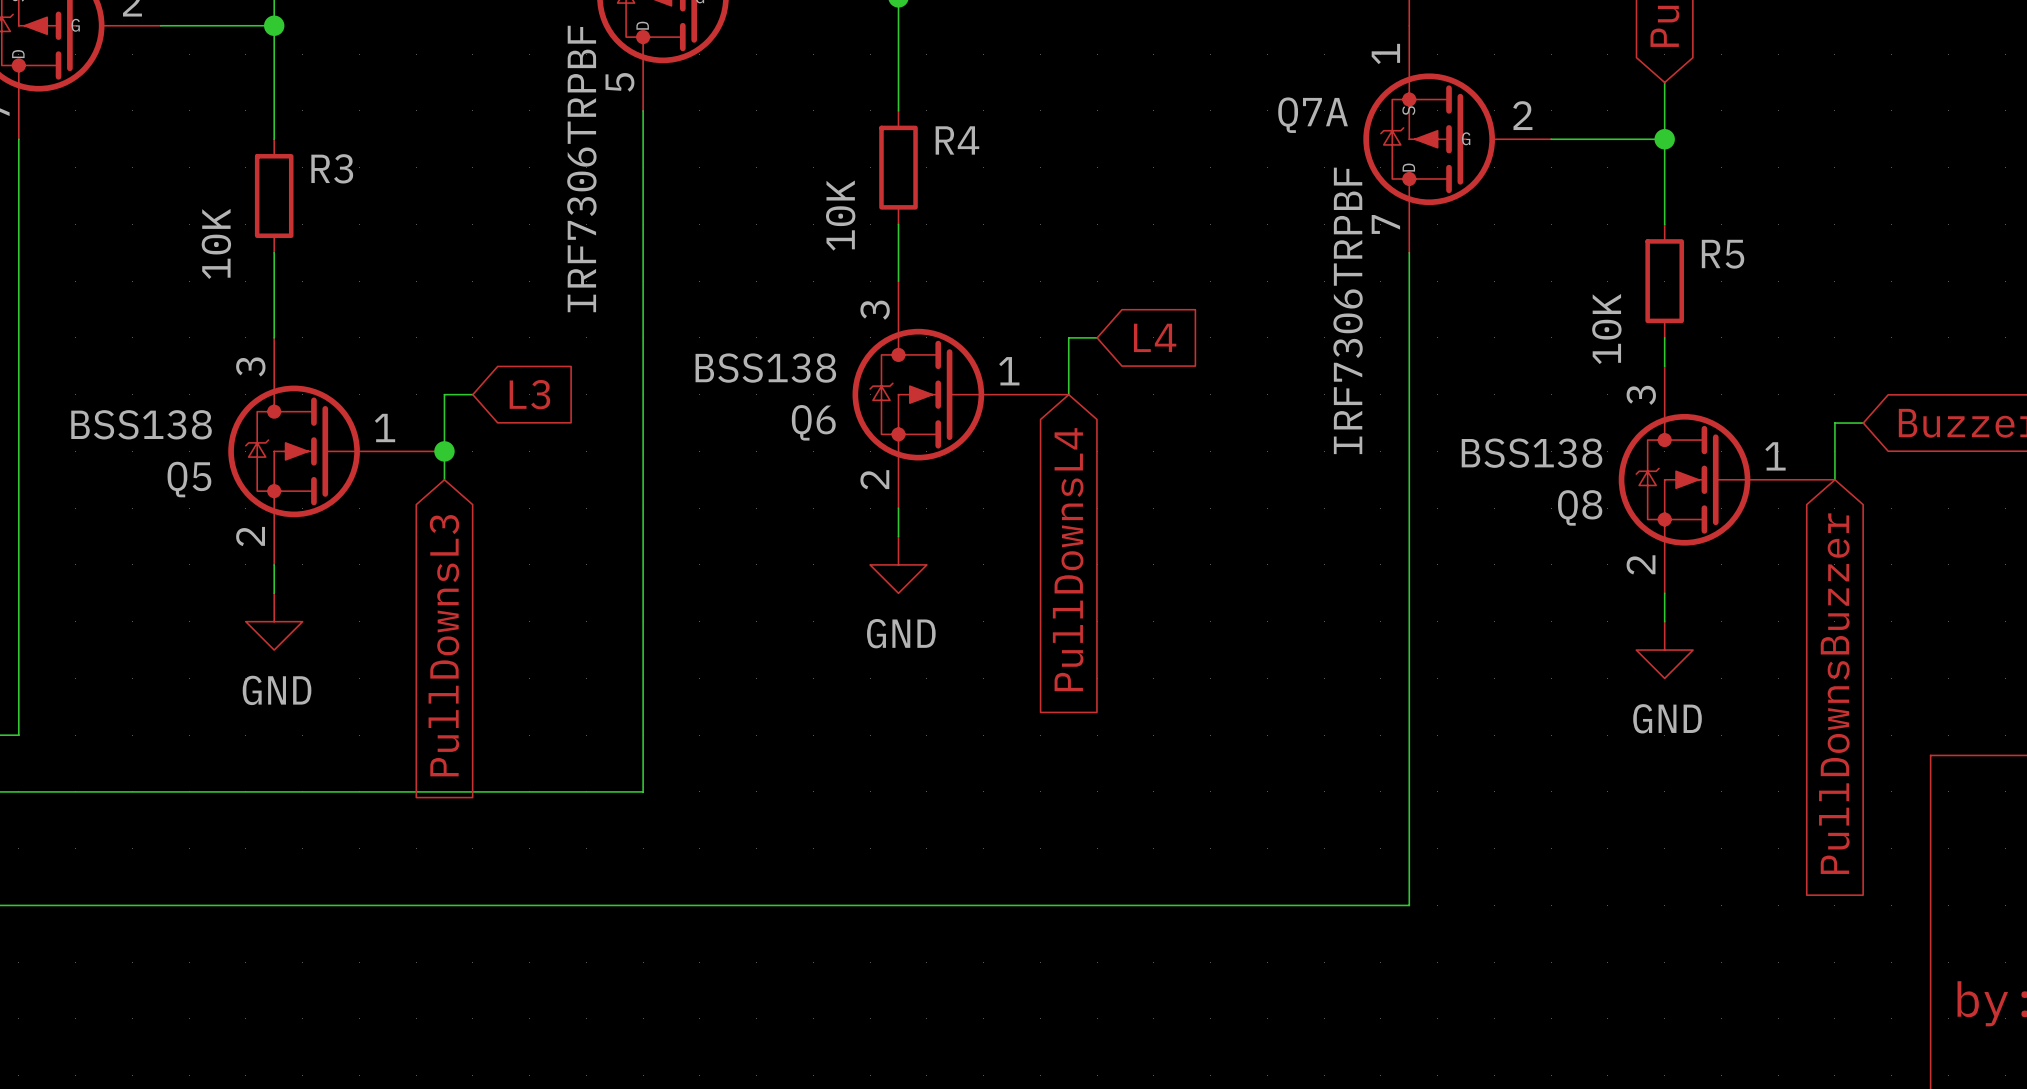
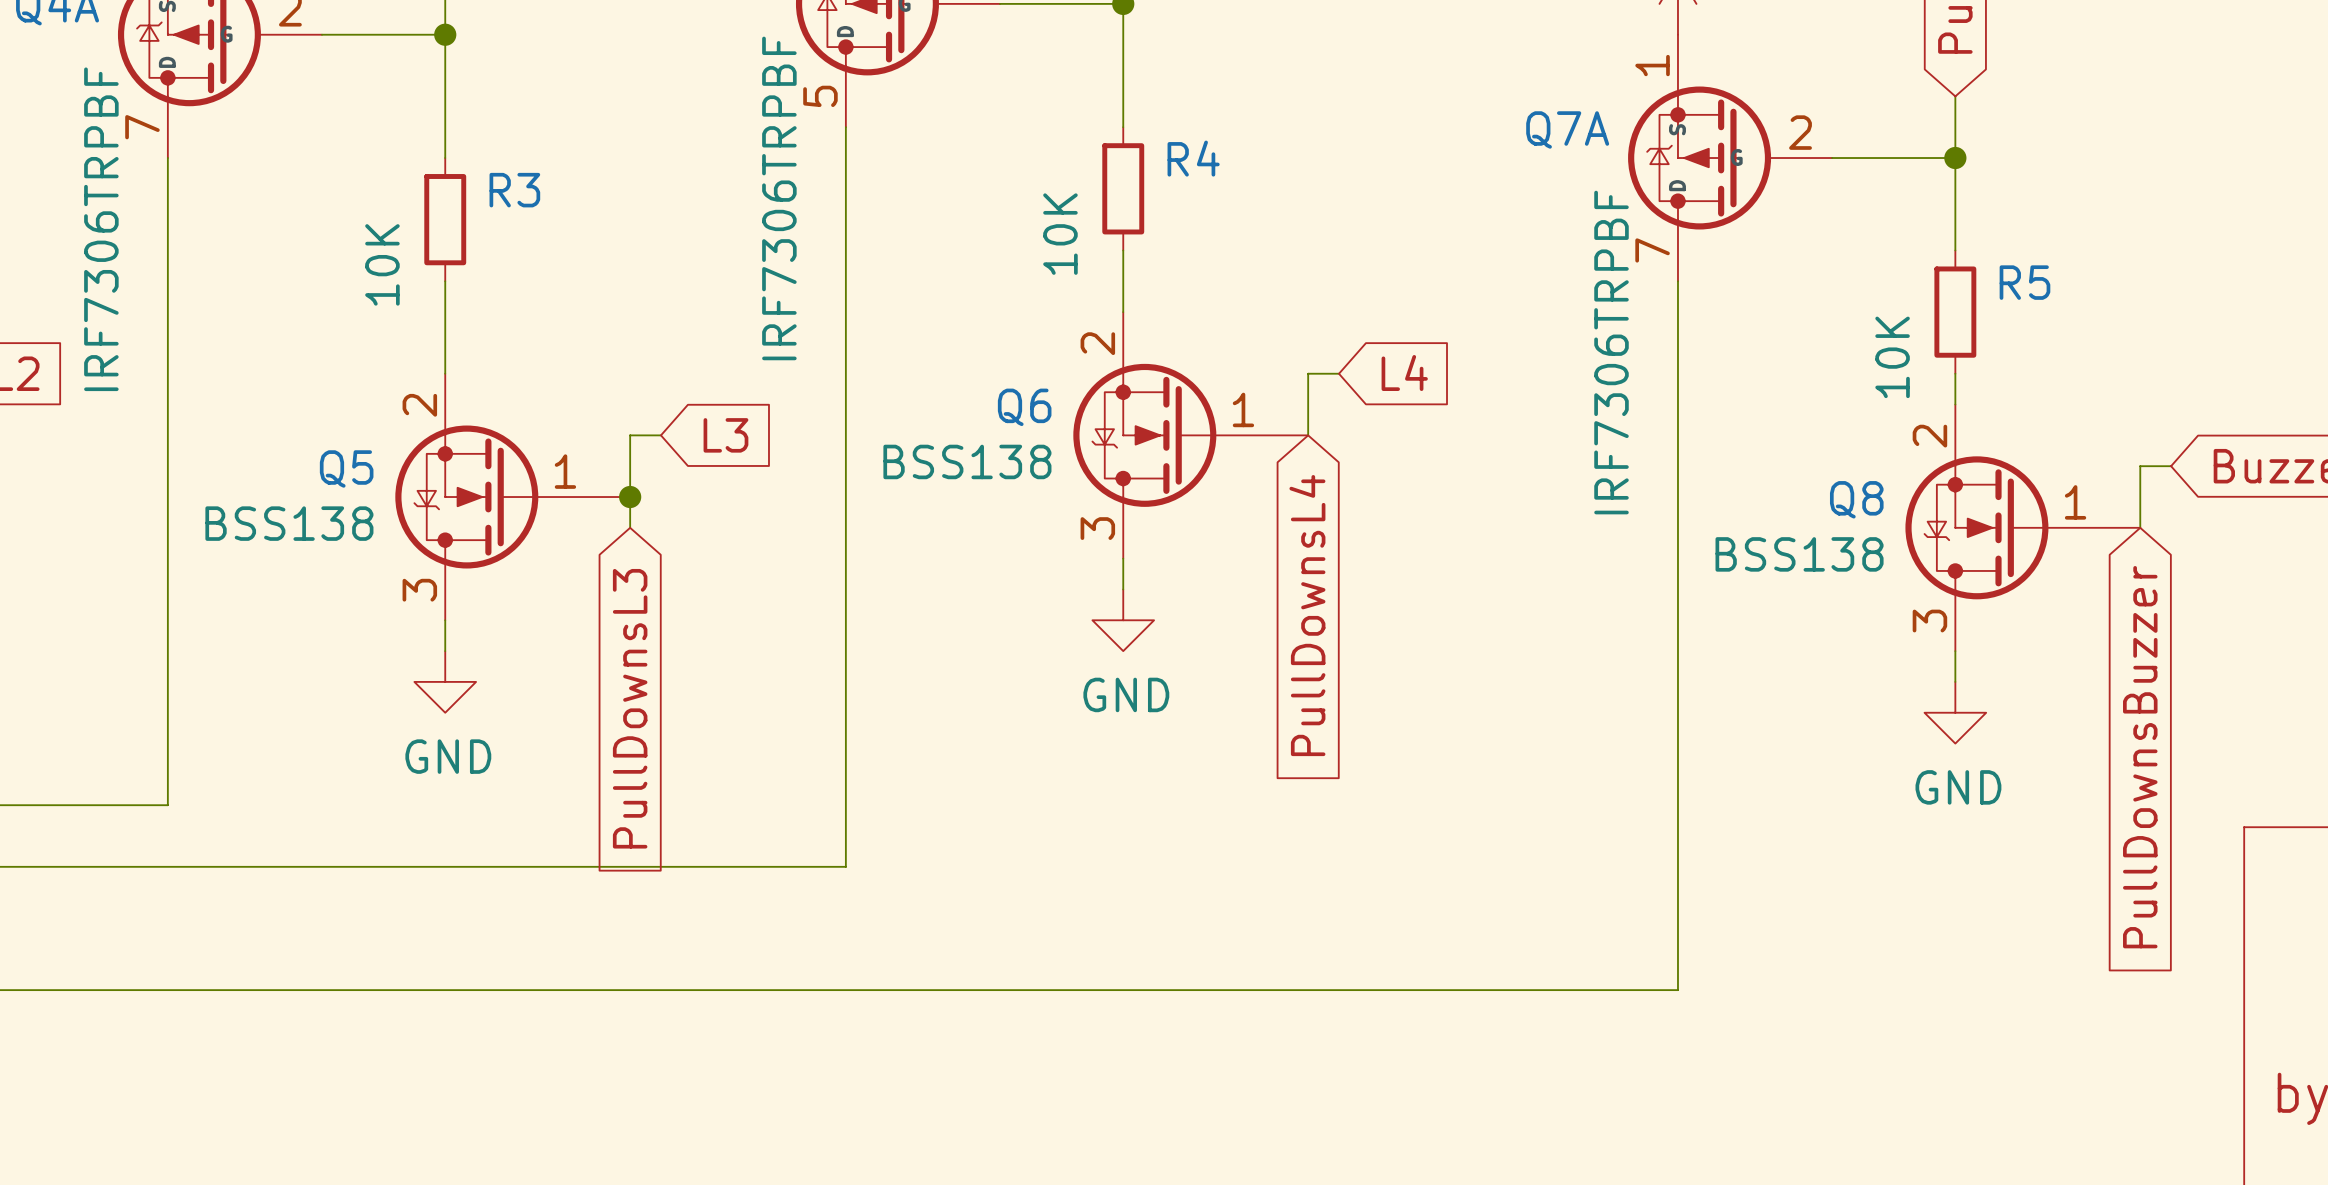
Q6 flip: as is (918, 394) -> up-down (1144, 435)
Q5 flip: as is (294, 451) -> up-down (466, 497)
Q8 flip: as is (1684, 479) -> up-down (1976, 527)

